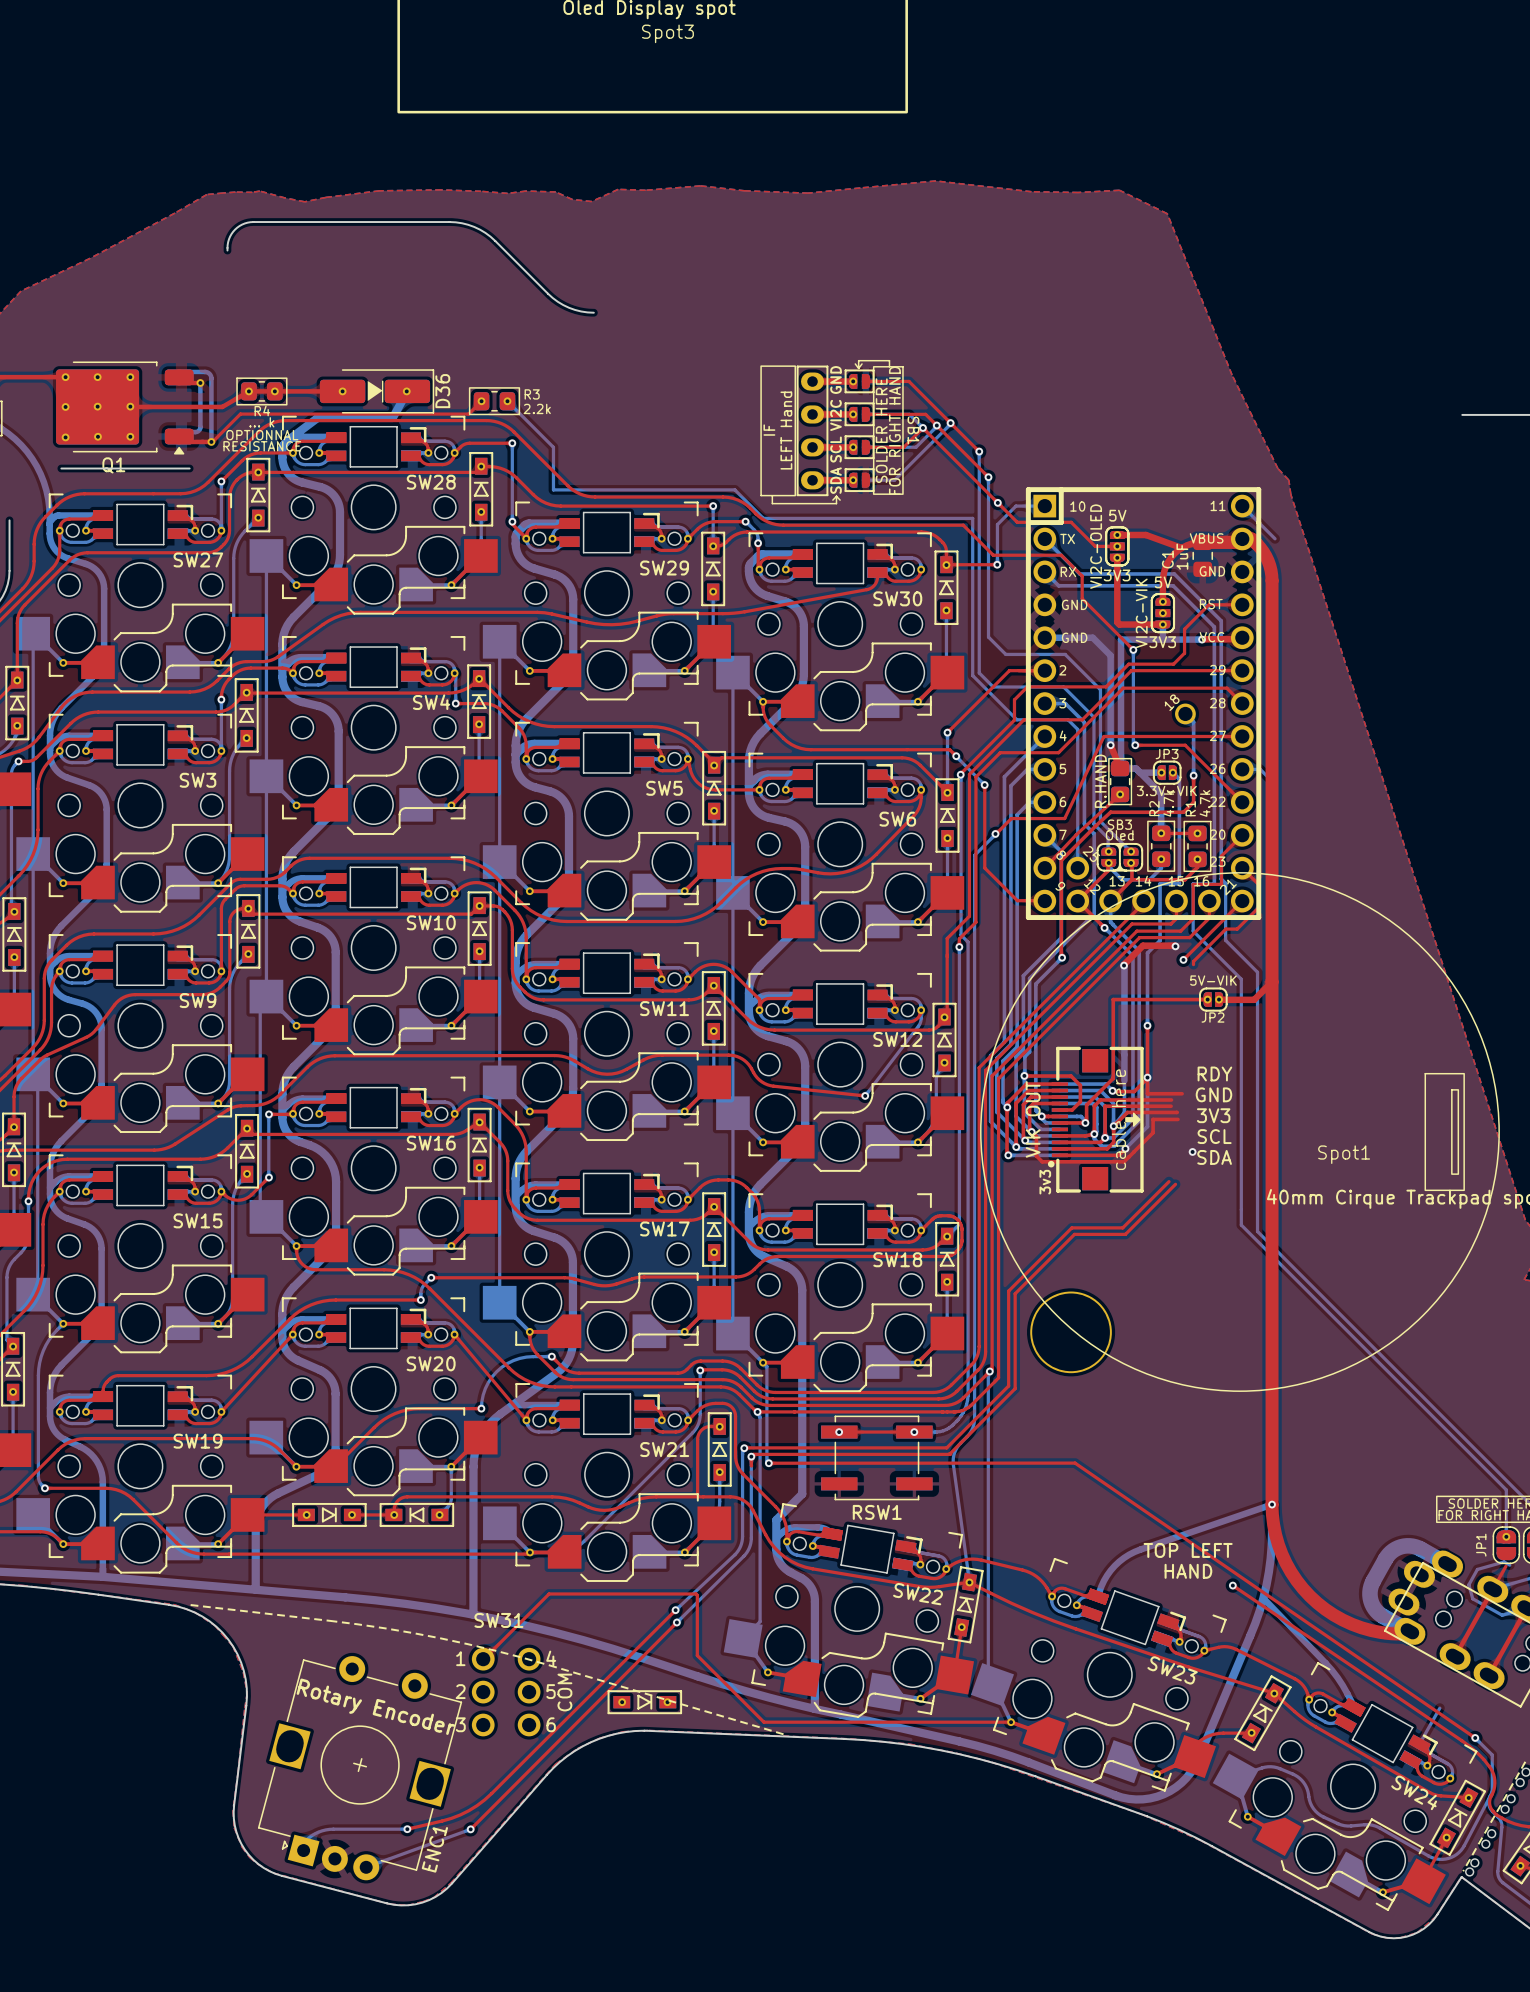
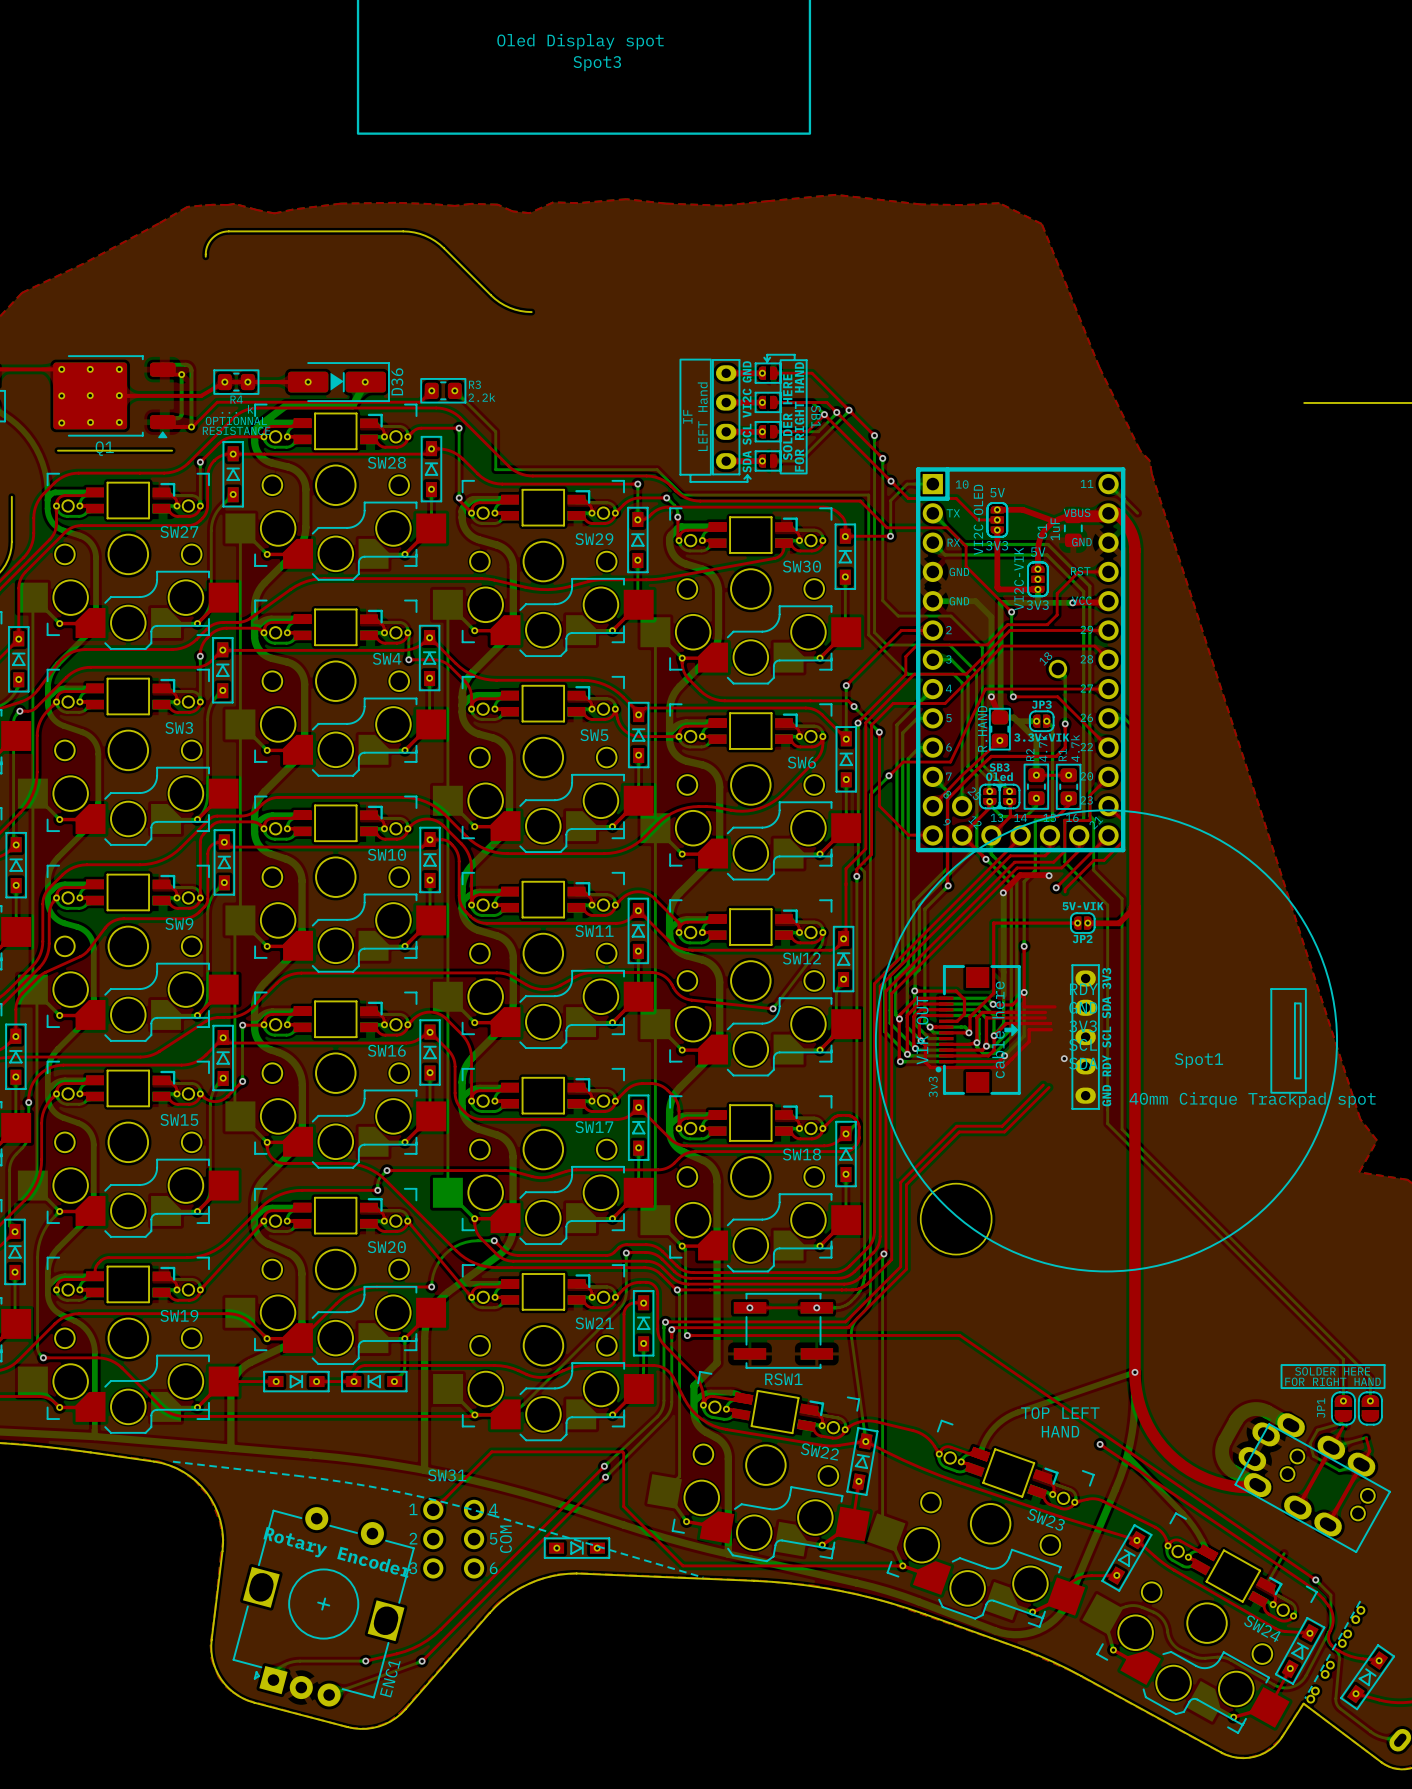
part: none -> (1085, 1037)

